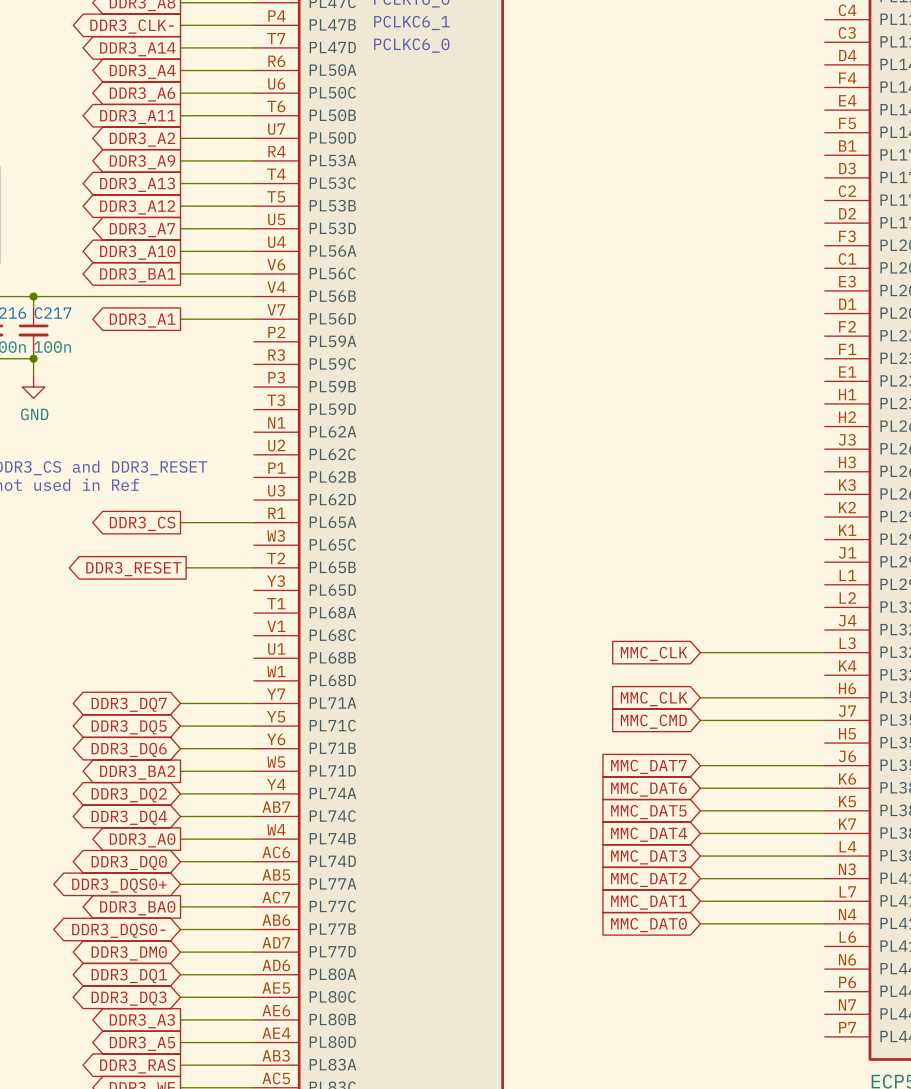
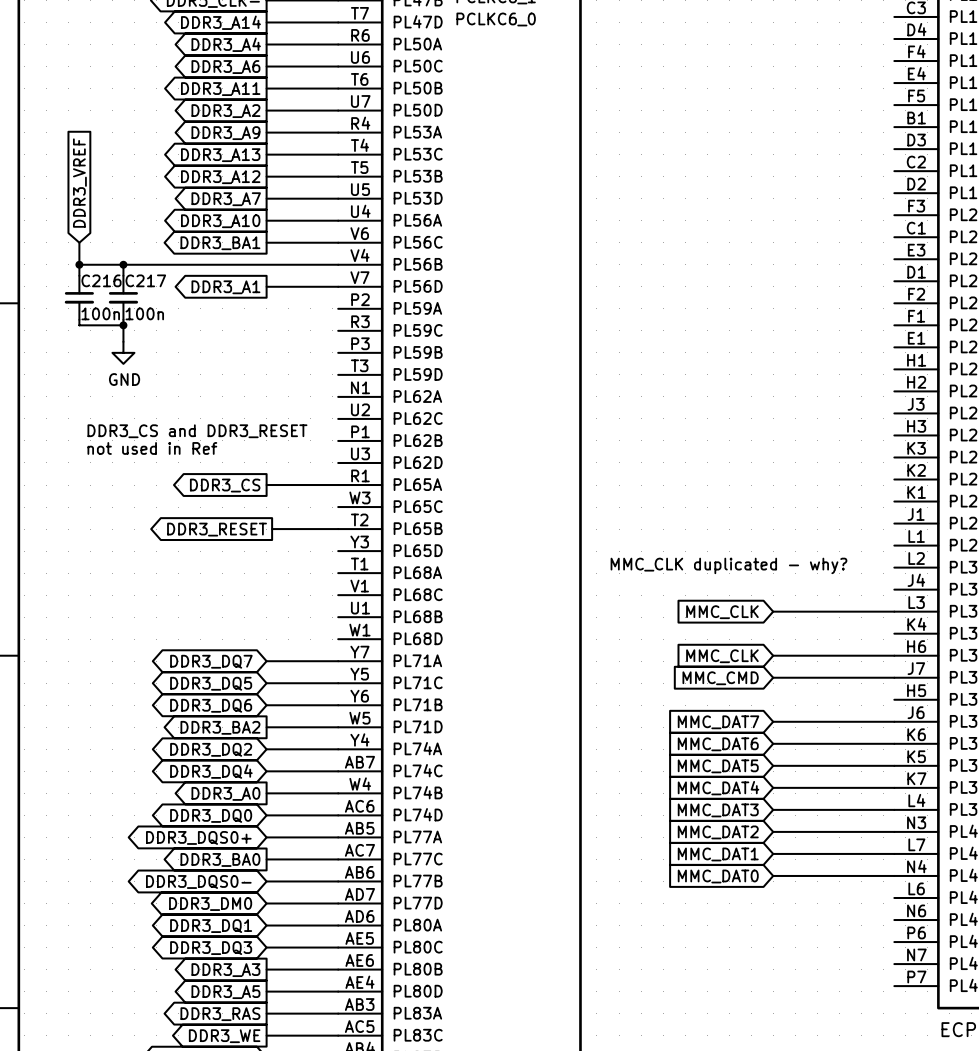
text: none -> MMC_CLK duplicated - why? (728, 565)

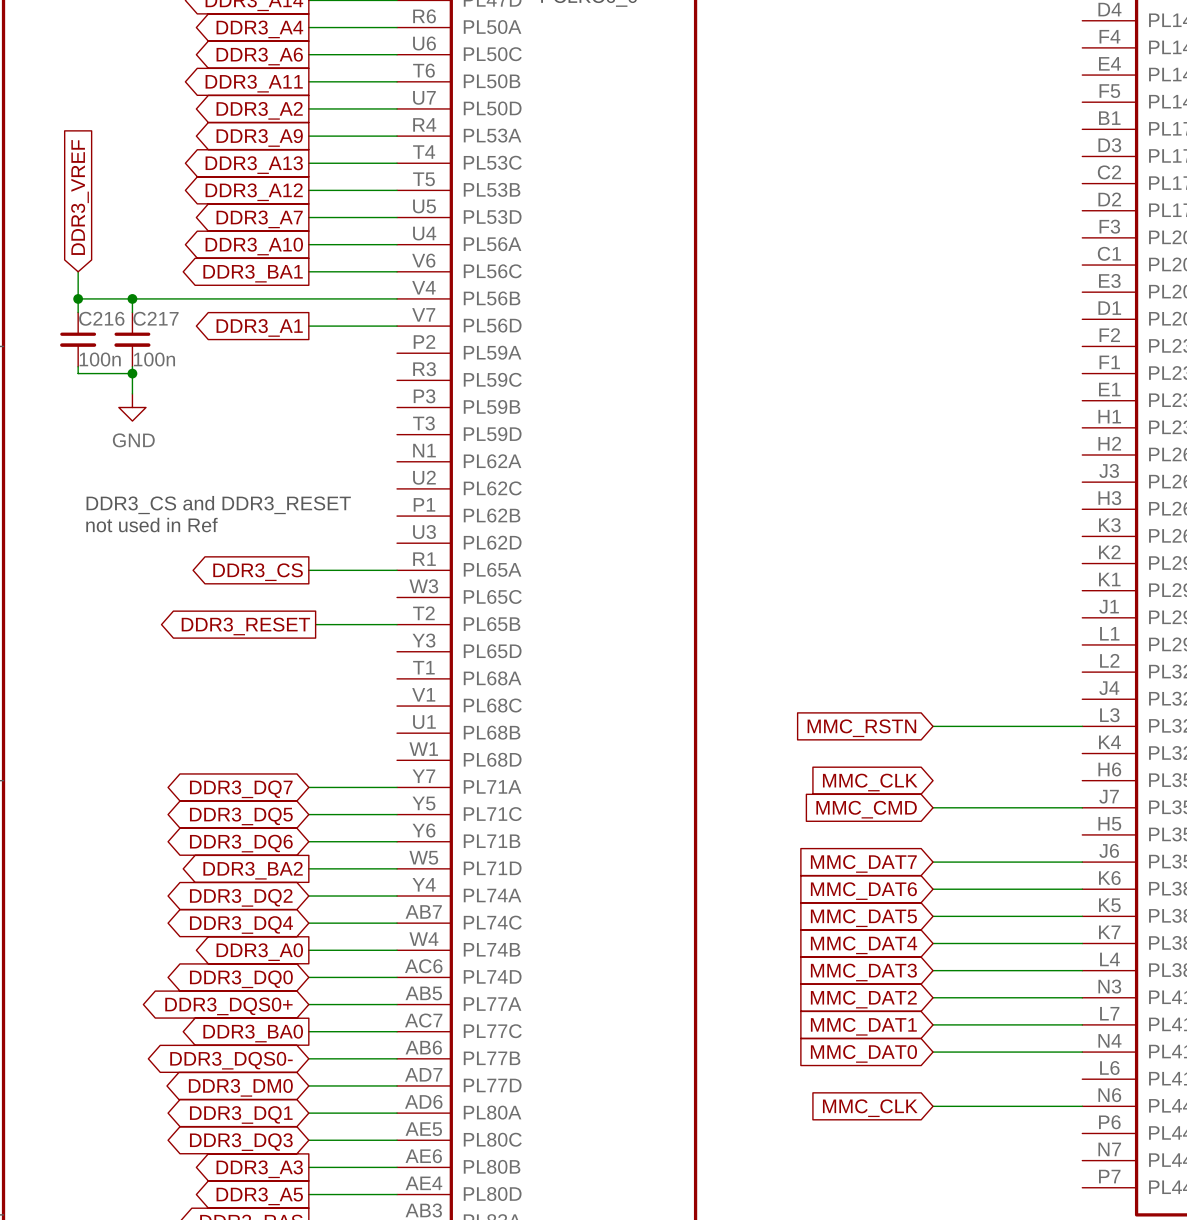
text: MMC_CLK duplicated - why? (728, 565) -> none
global label: MMC_CLK (722, 612) -> MMC_RSTN (861, 728)
wire: (773, 655) (894, 655) -> none
global label: none -> MMC_CLK (870, 1108)
wire: none -> (933, 1106) (1082, 1106)

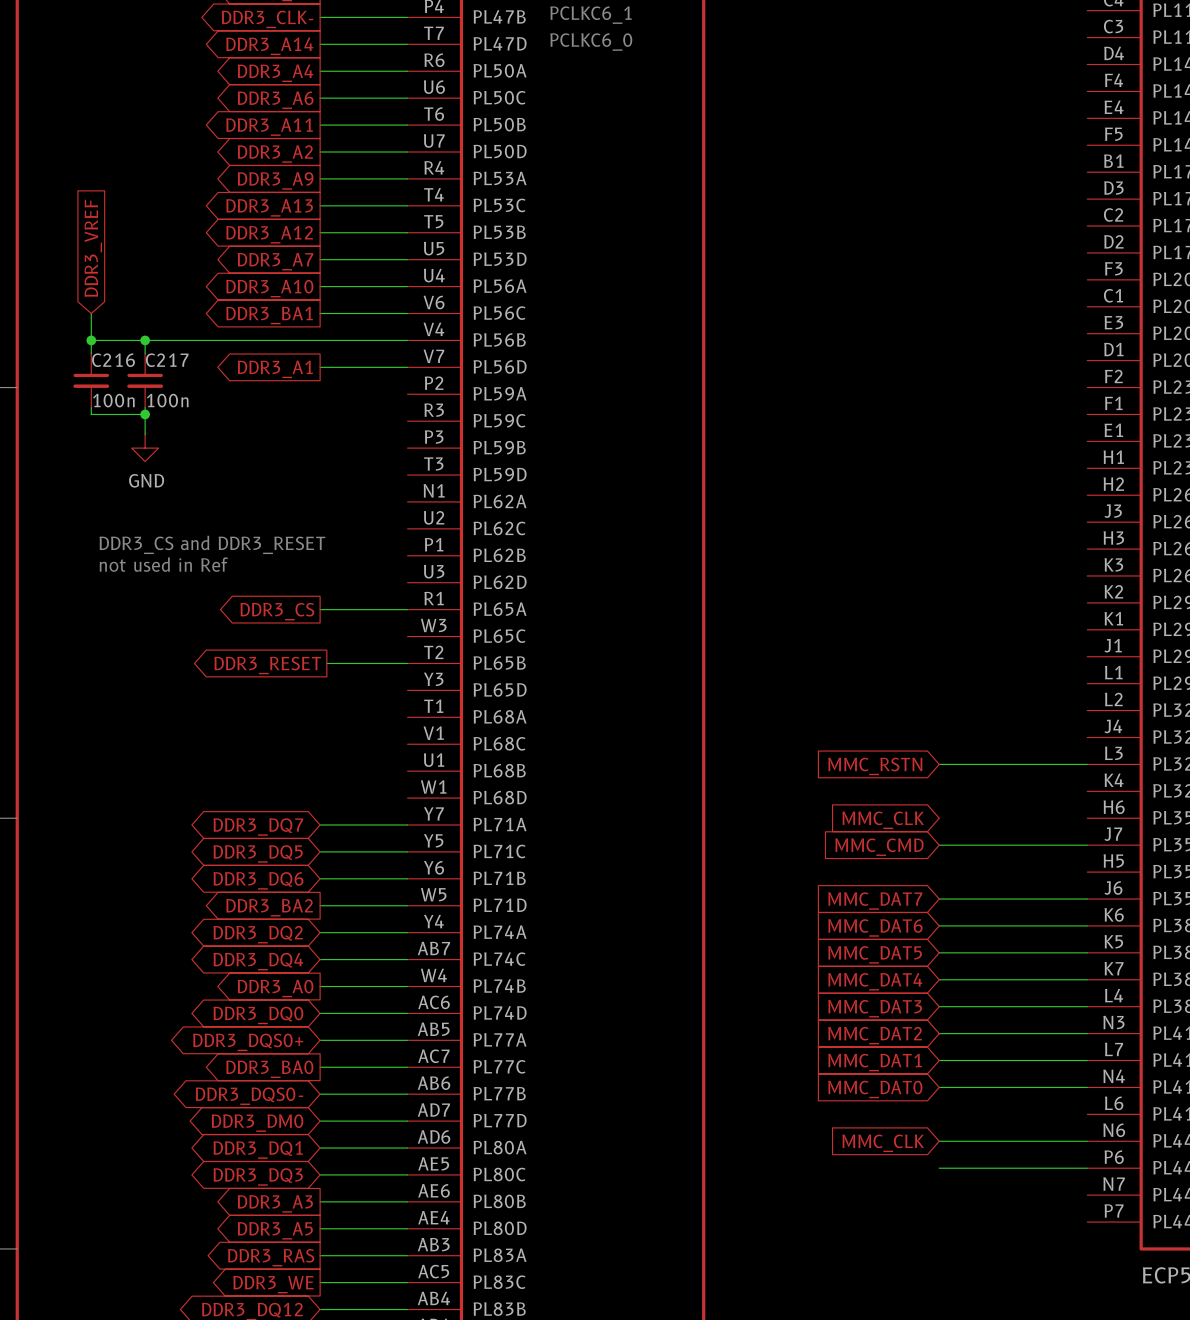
wire: none -> (939, 1168) (1087, 1168)

